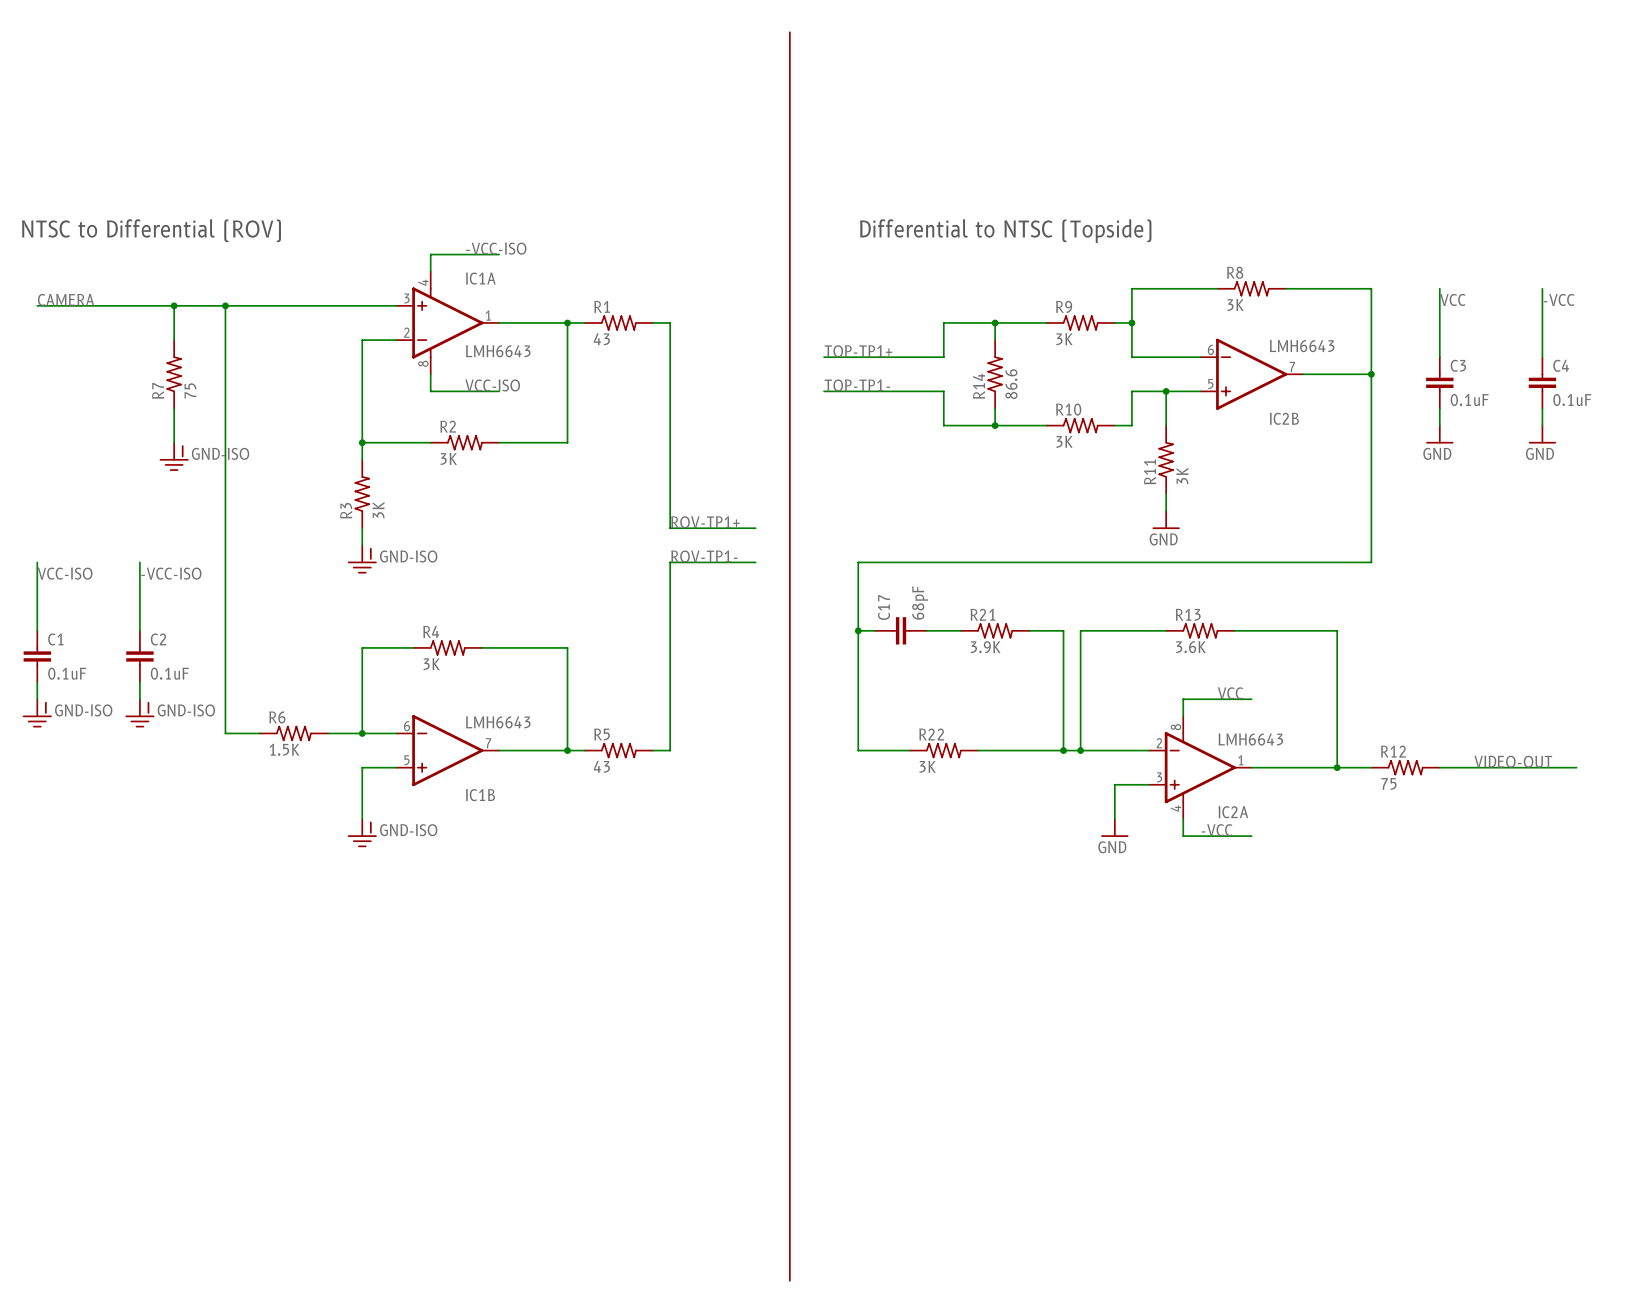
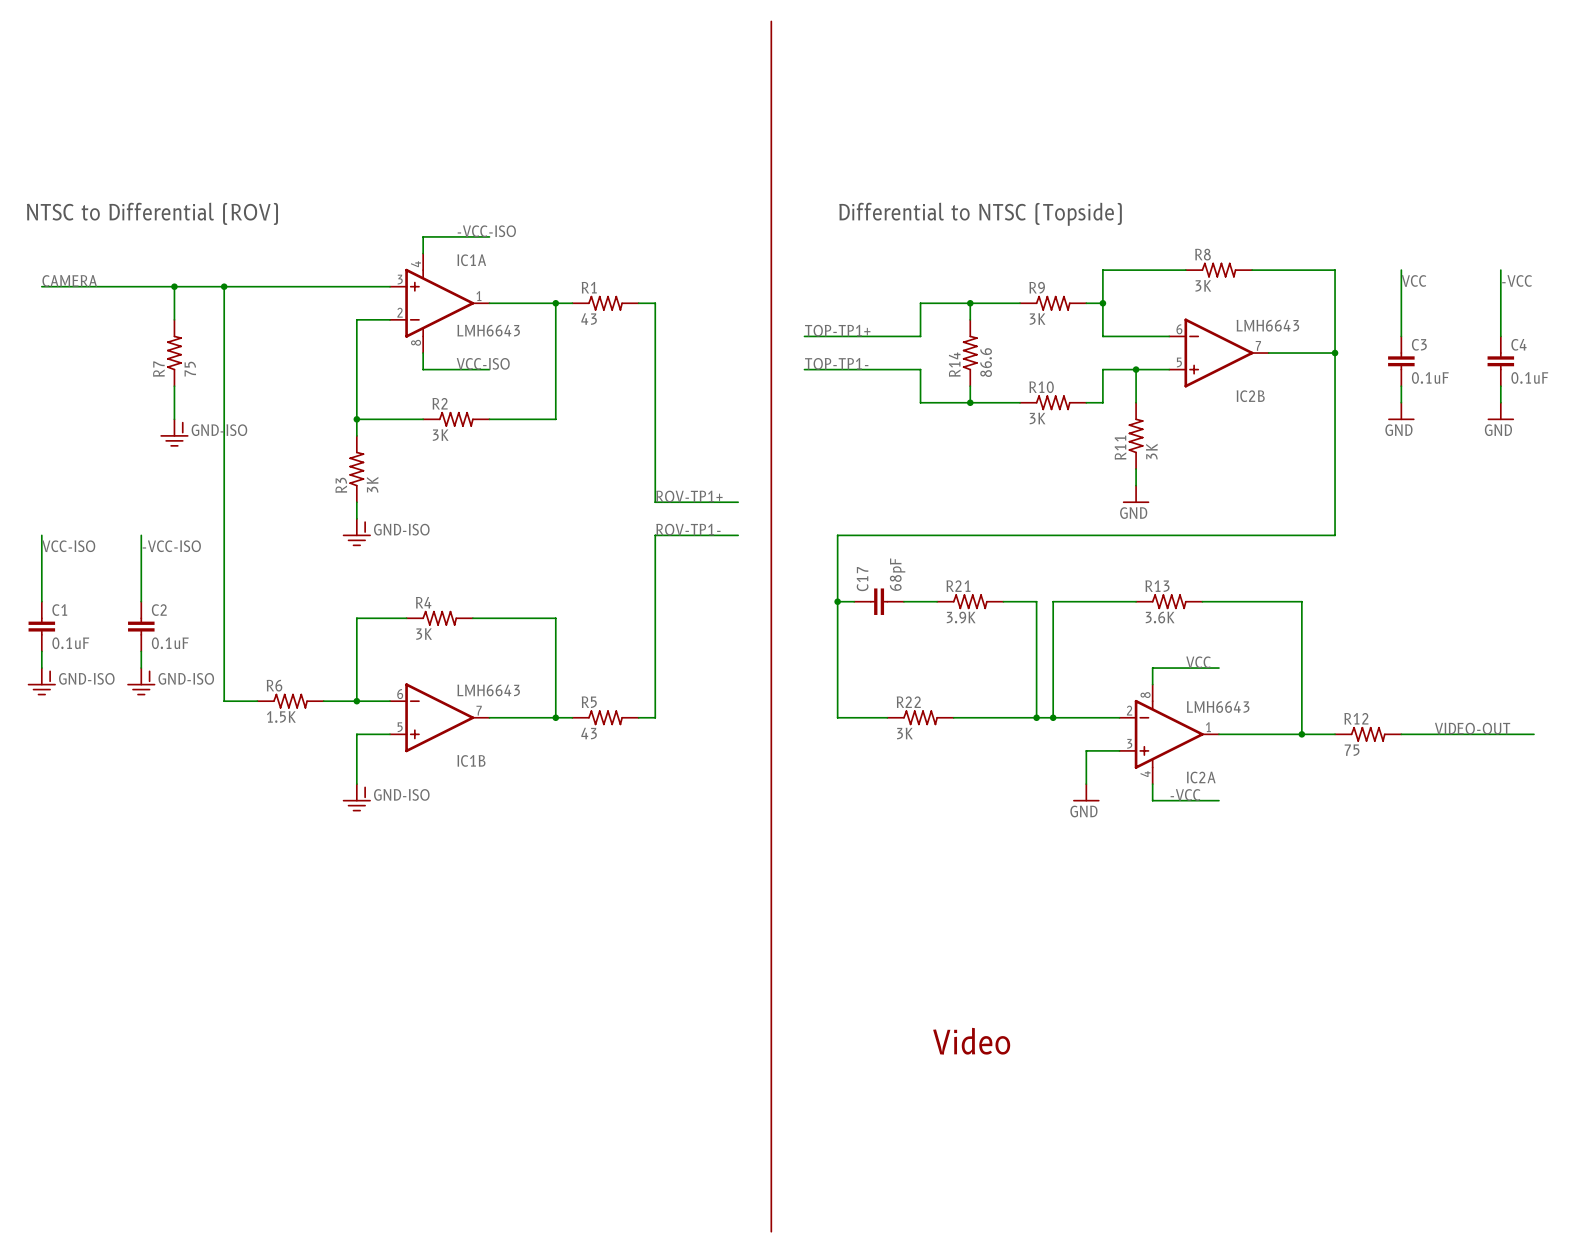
text: none -> Video (971, 1041)

